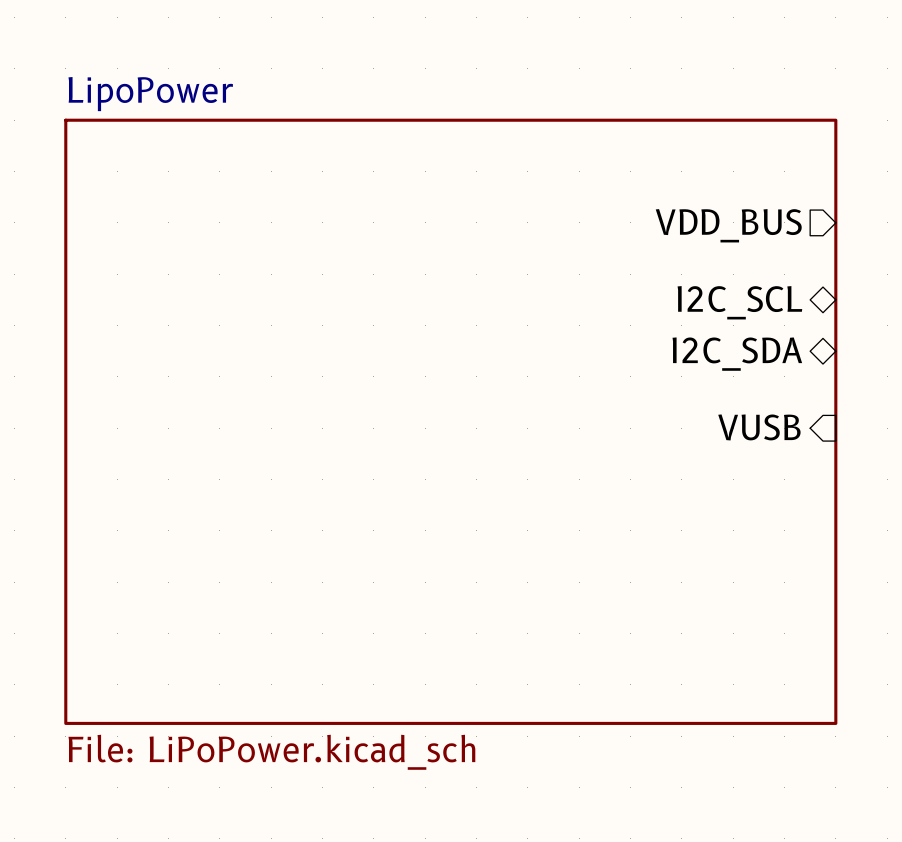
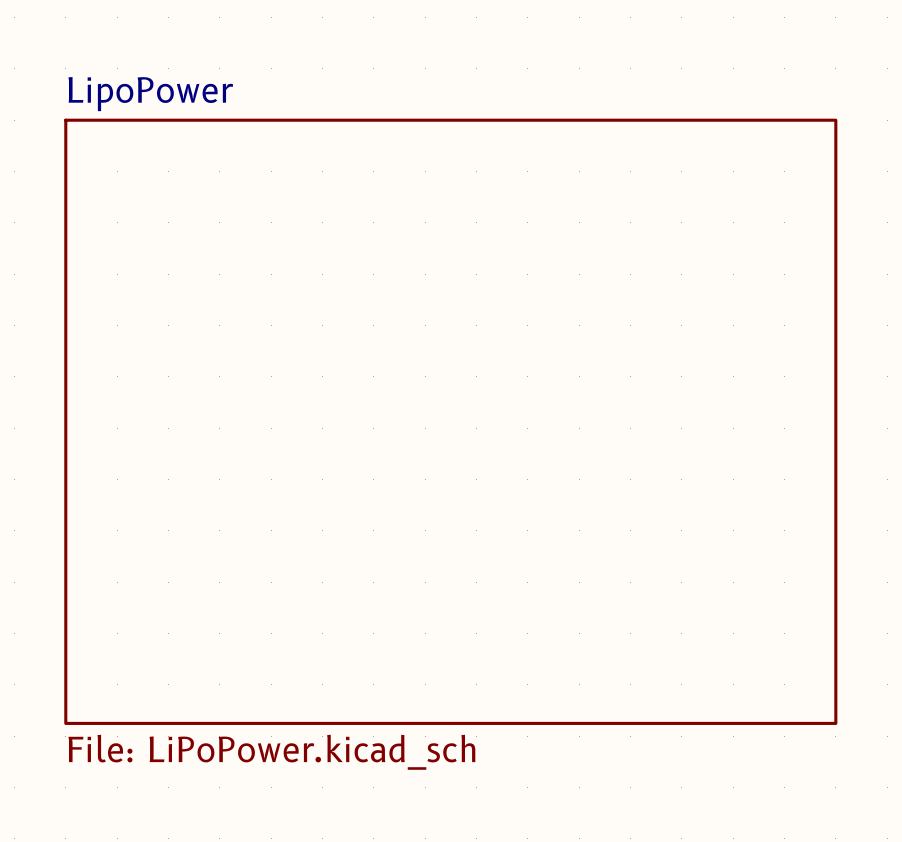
sheet pin: VDD_BUS (728, 225) -> none
sheet pin: I2C_SCL (739, 302) -> none
sheet pin: I2C_SDA (737, 354) -> none
sheet pin: VUSB (759, 427) -> none

